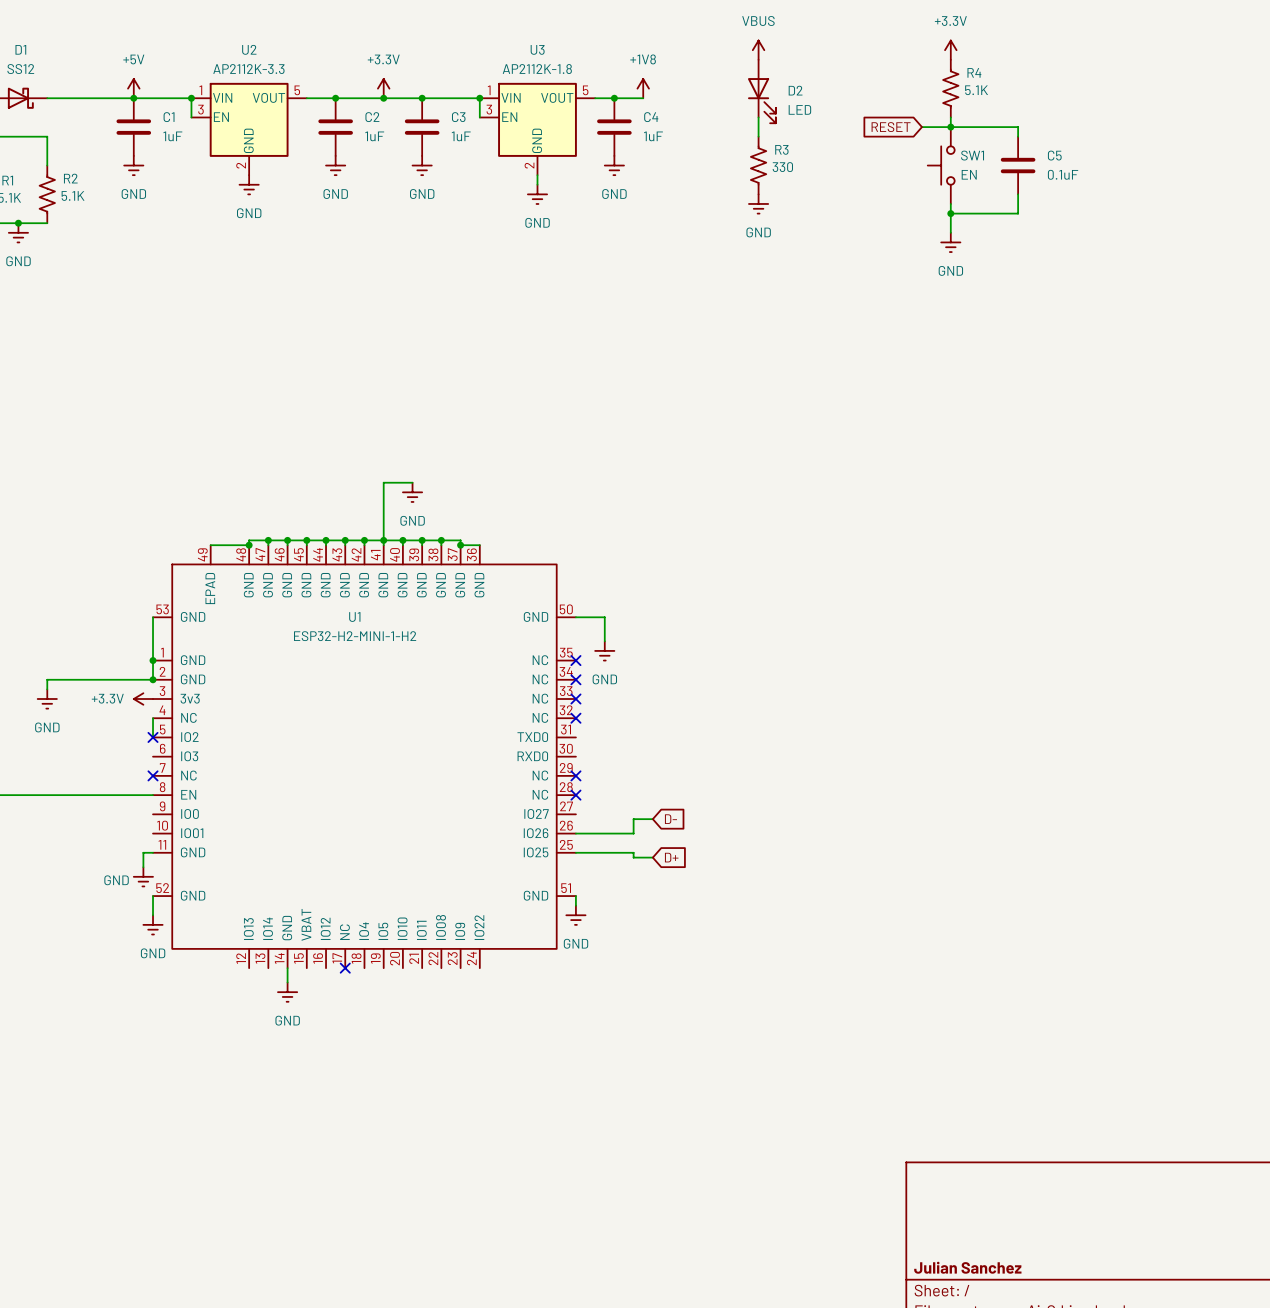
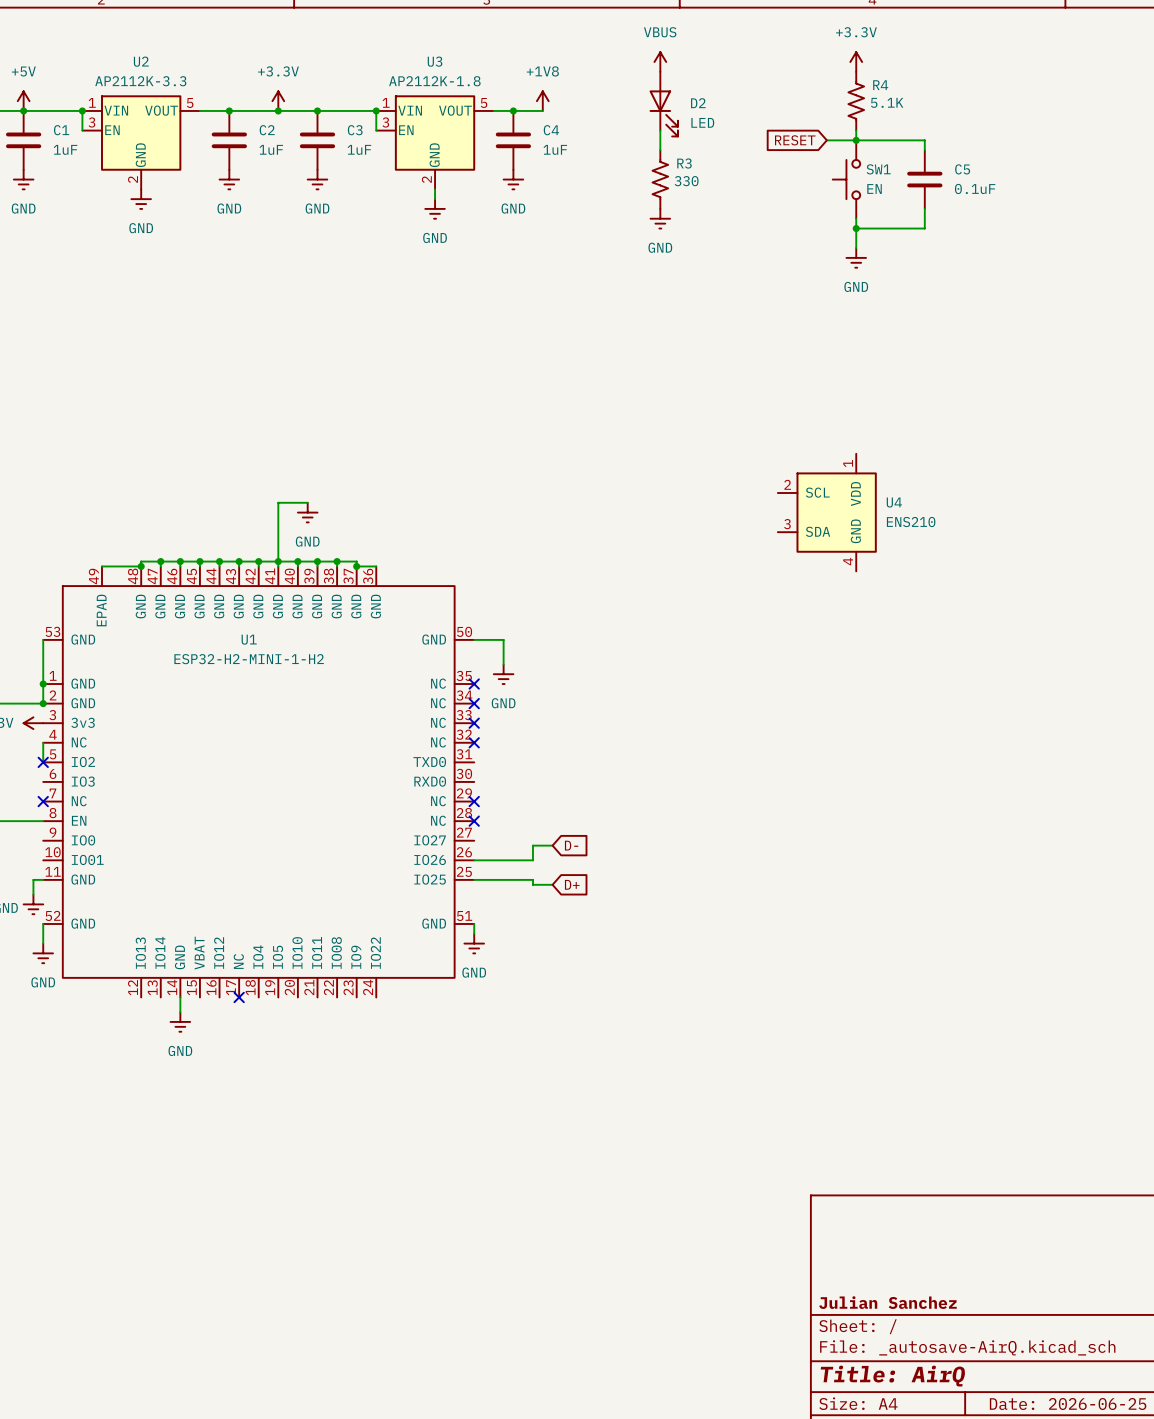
U4: none -> ENS210 (827, 512)

